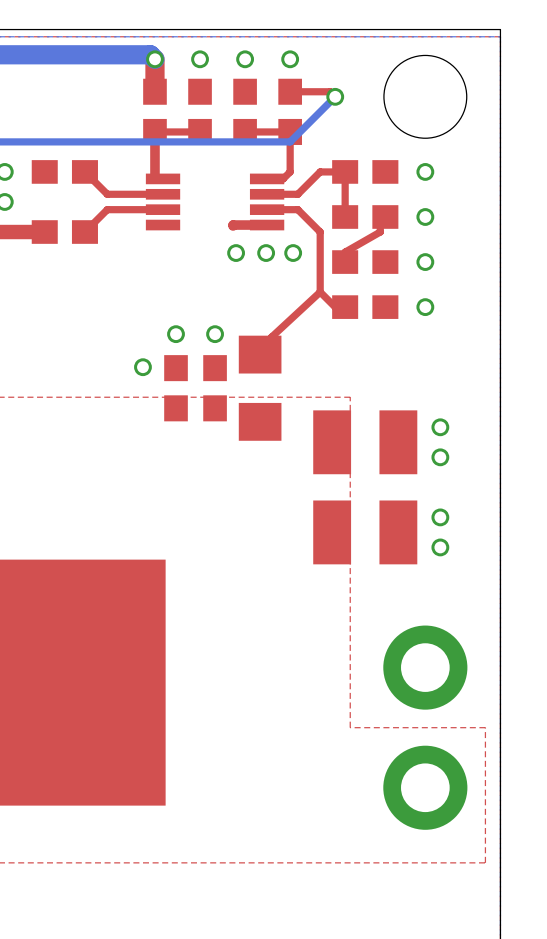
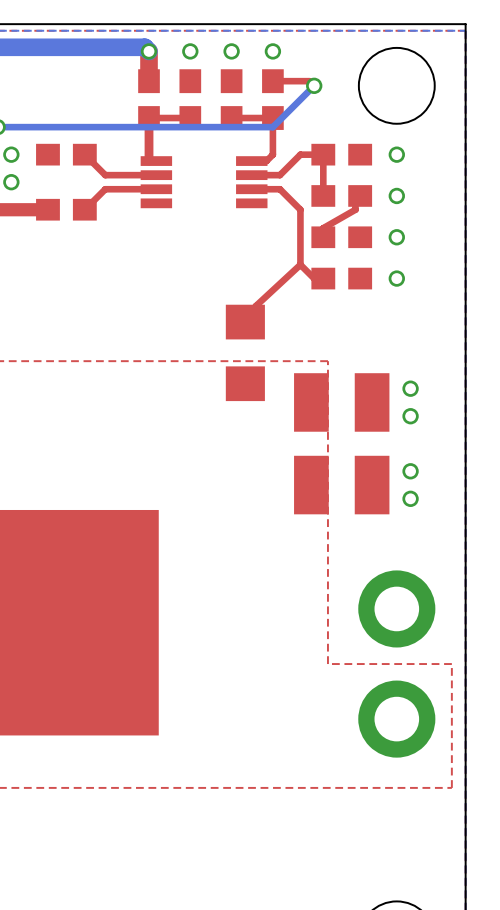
top track: (267, 225) (233, 226) -> none
via: (236, 253) -> none
via: (266, 253) -> none
via: (293, 253) -> none
via: (176, 334) -> none
via: (215, 334) -> none
via: (142, 367) -> none
part: (176, 388) -> none
part: (215, 388) -> none

